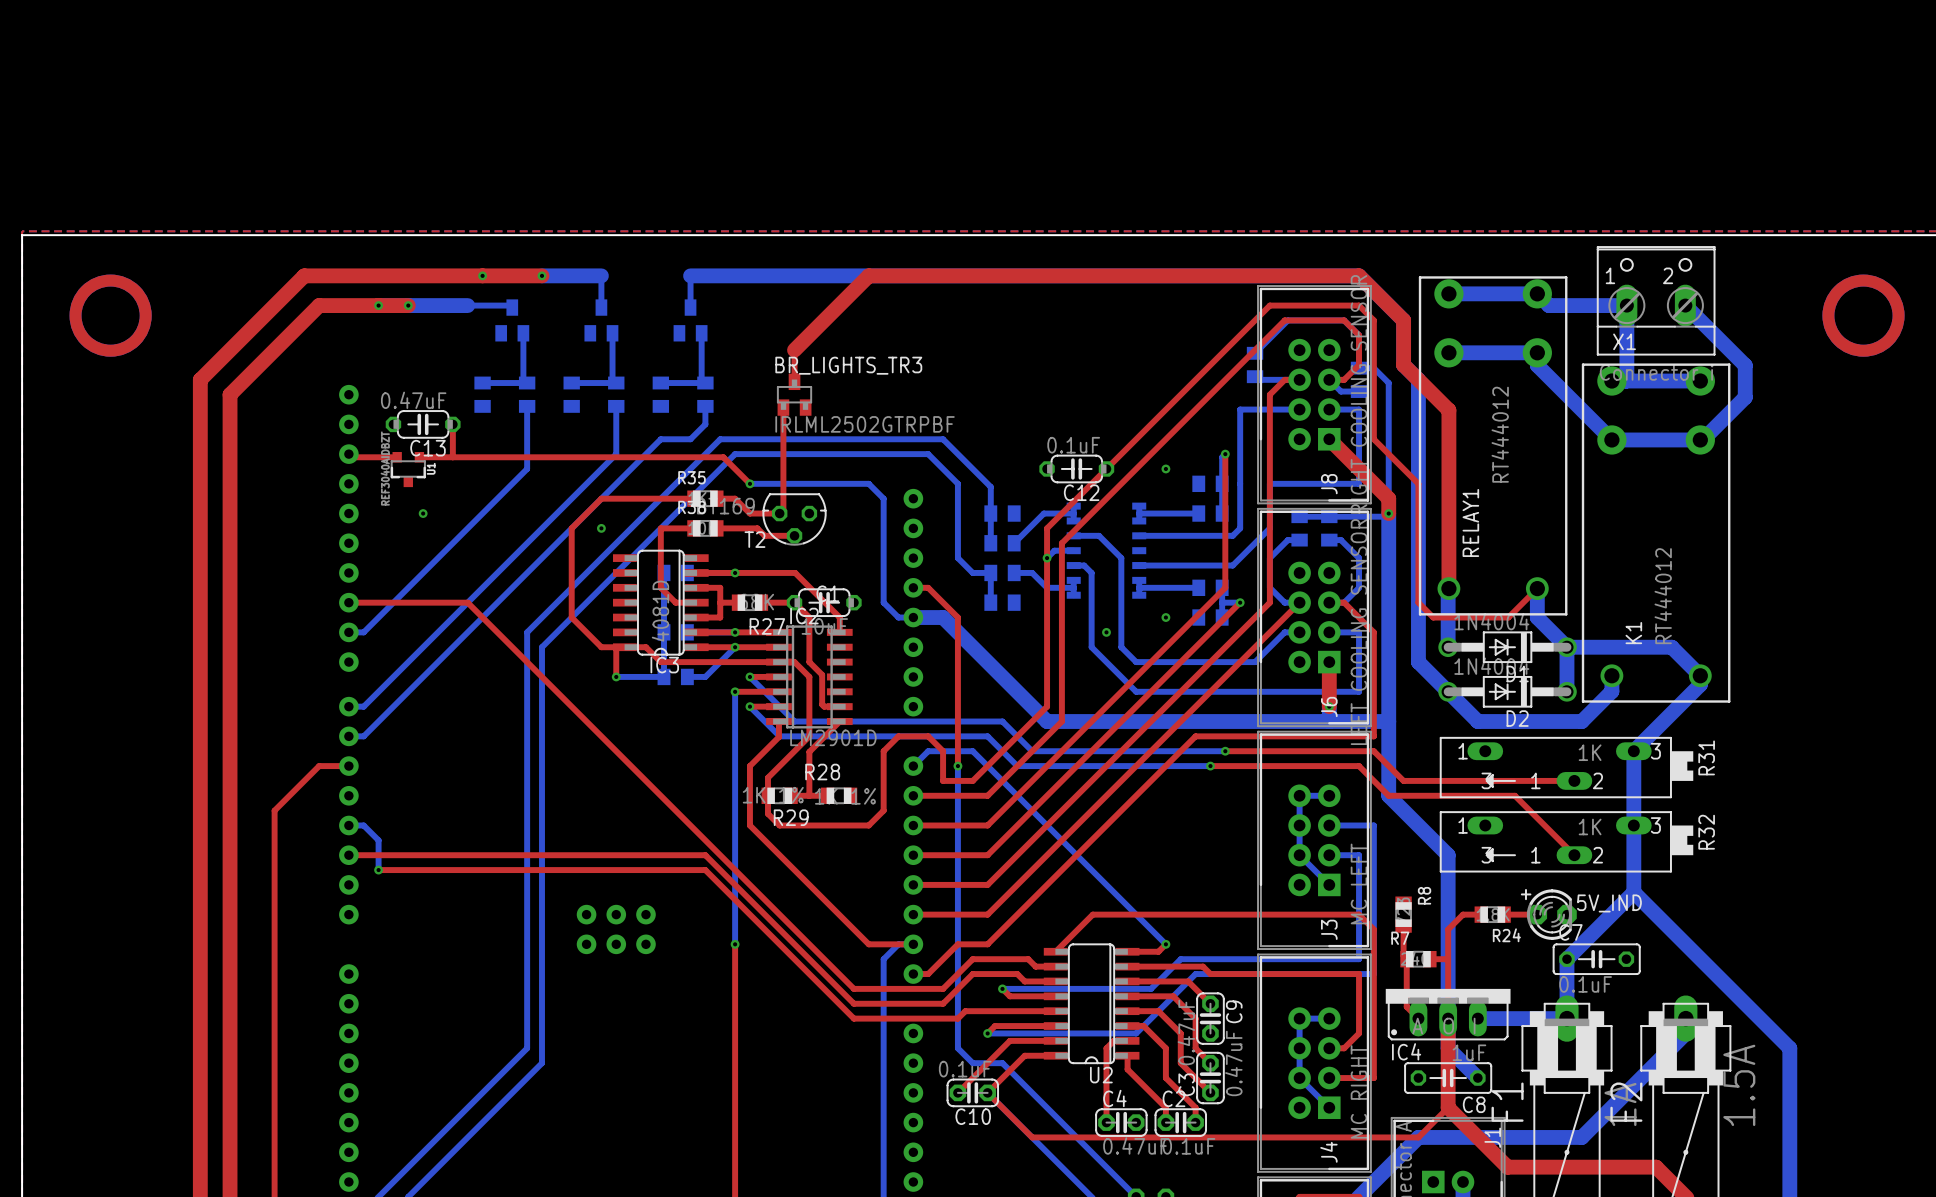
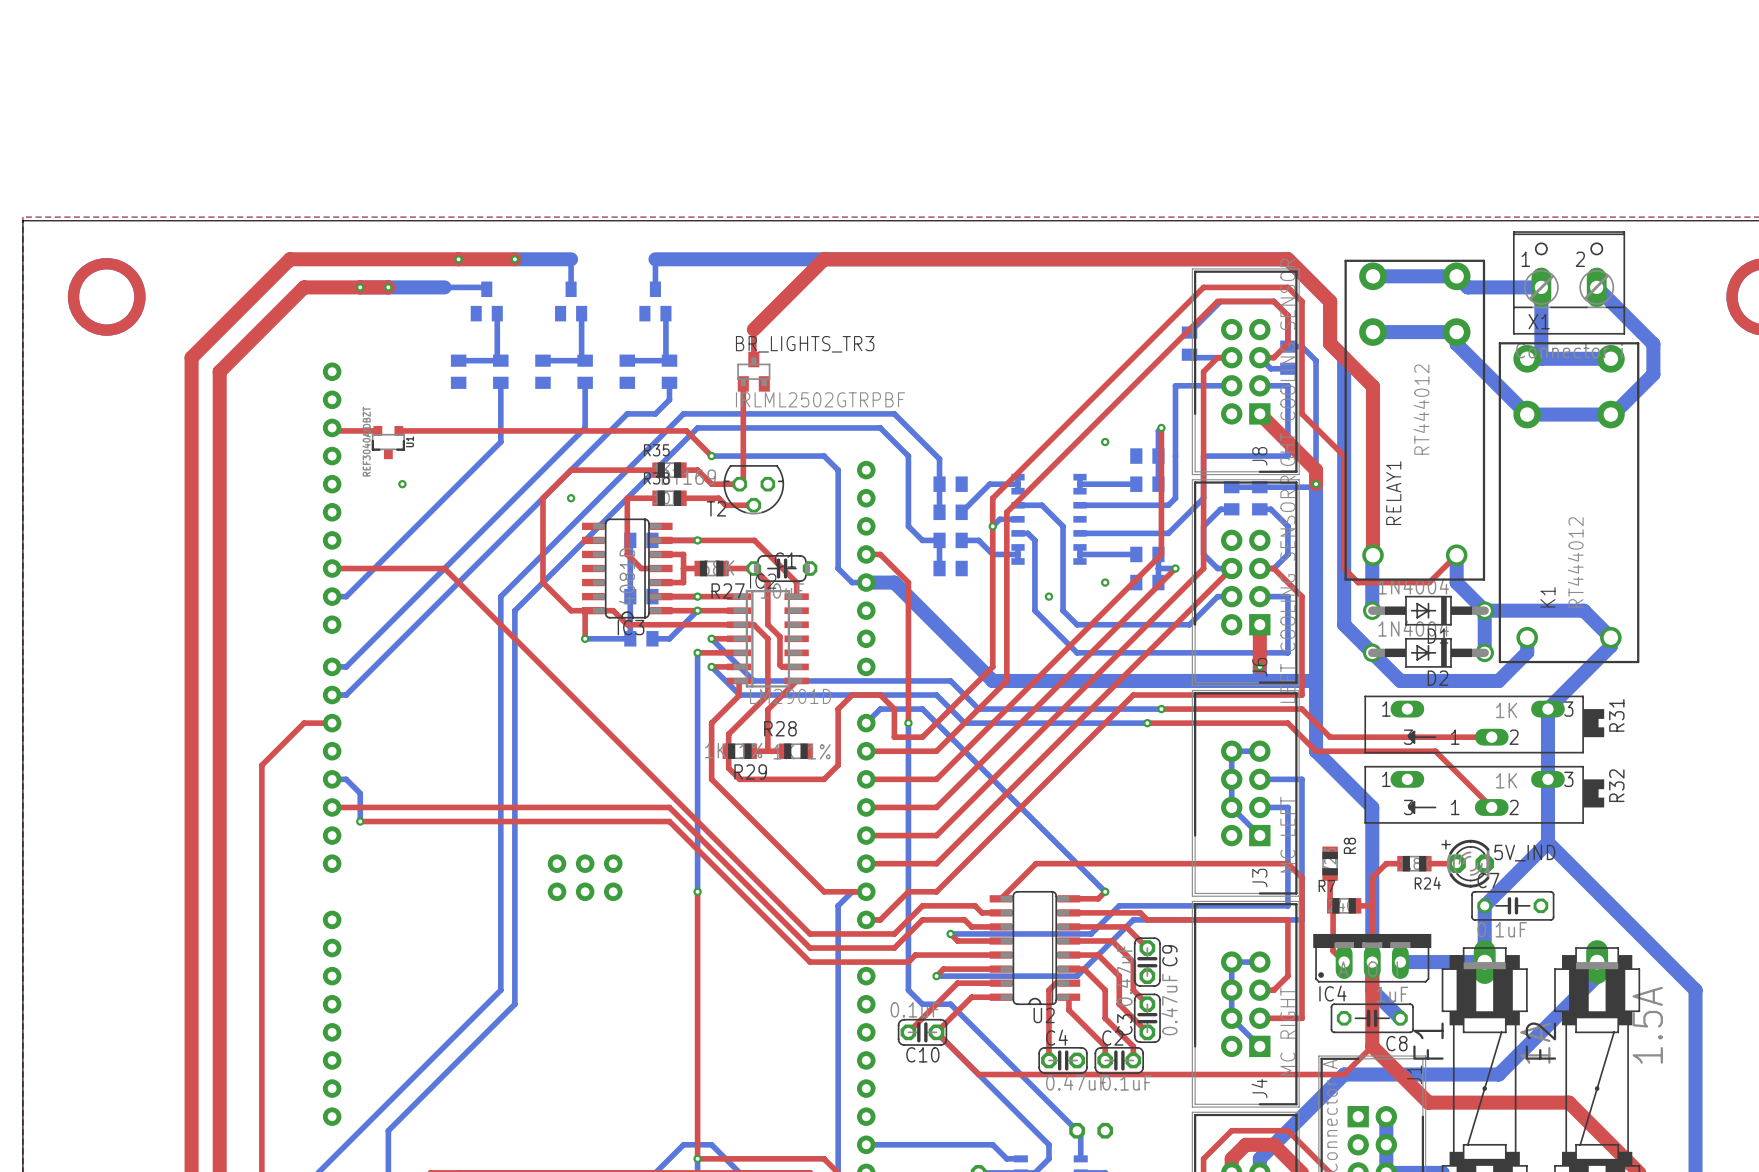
C13: 0.47uF (423, 424) -> none
top track: (452, 424) (452, 457) -> none
C12: 0.1uF (1076, 468) -> none

